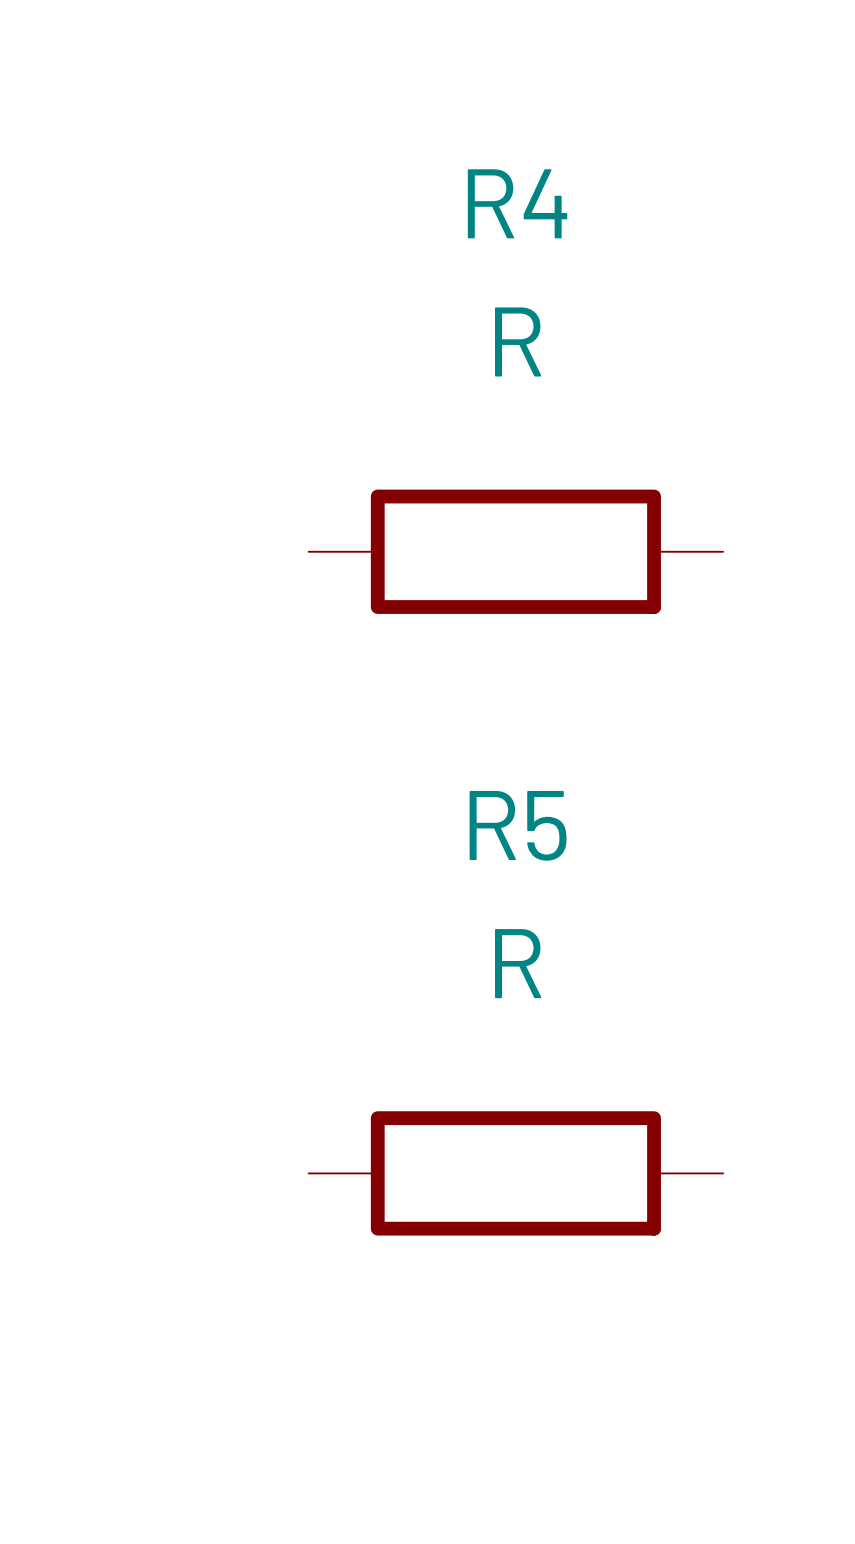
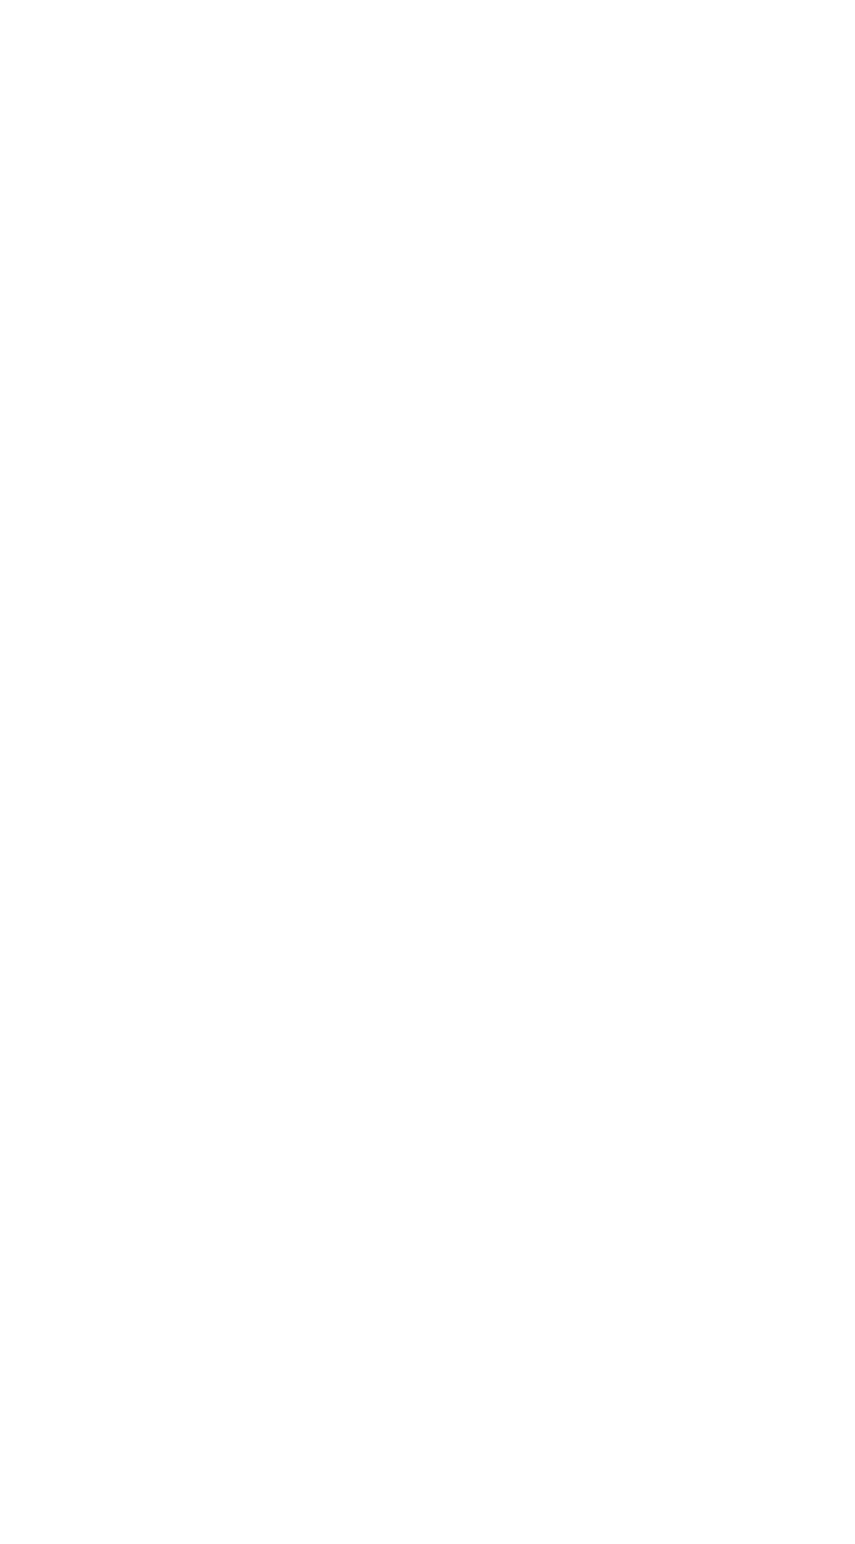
R4: R (515, 551) -> none
R5: R (515, 1173) -> none

